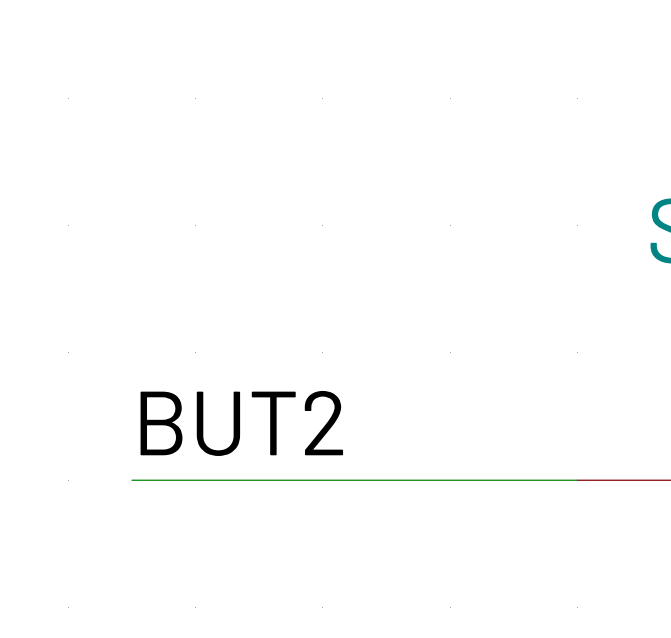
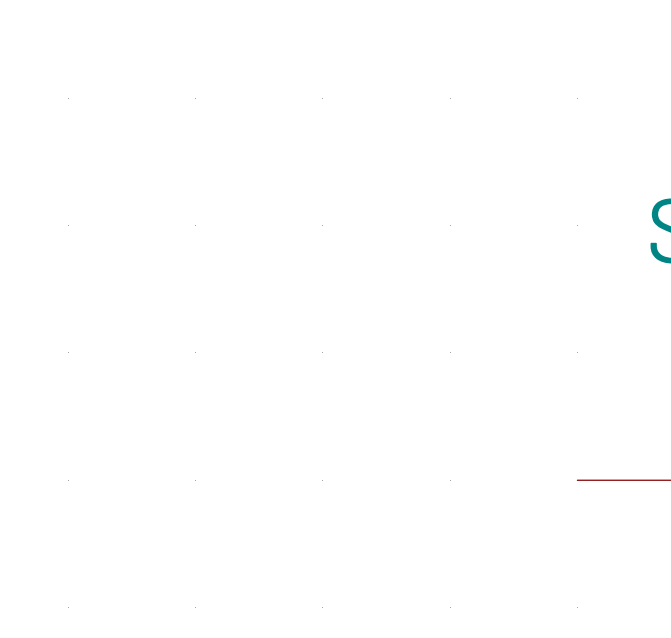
label: BUT2 (241, 423) -> none
wire: (132, 480) (577, 480) -> none

